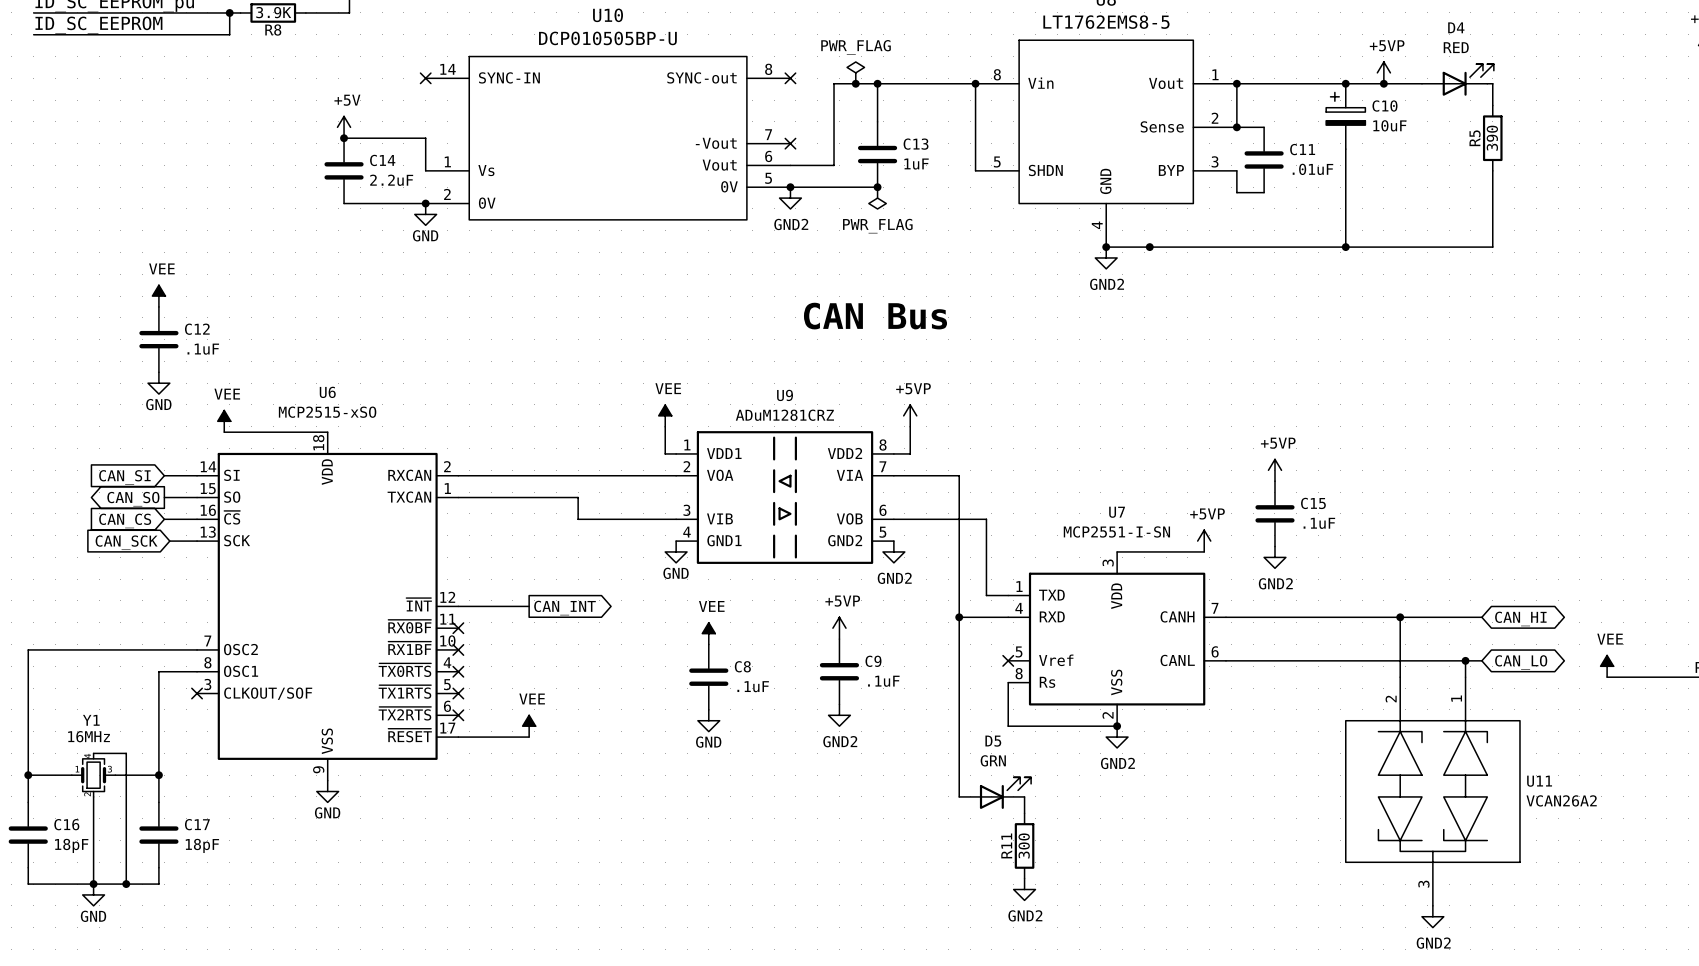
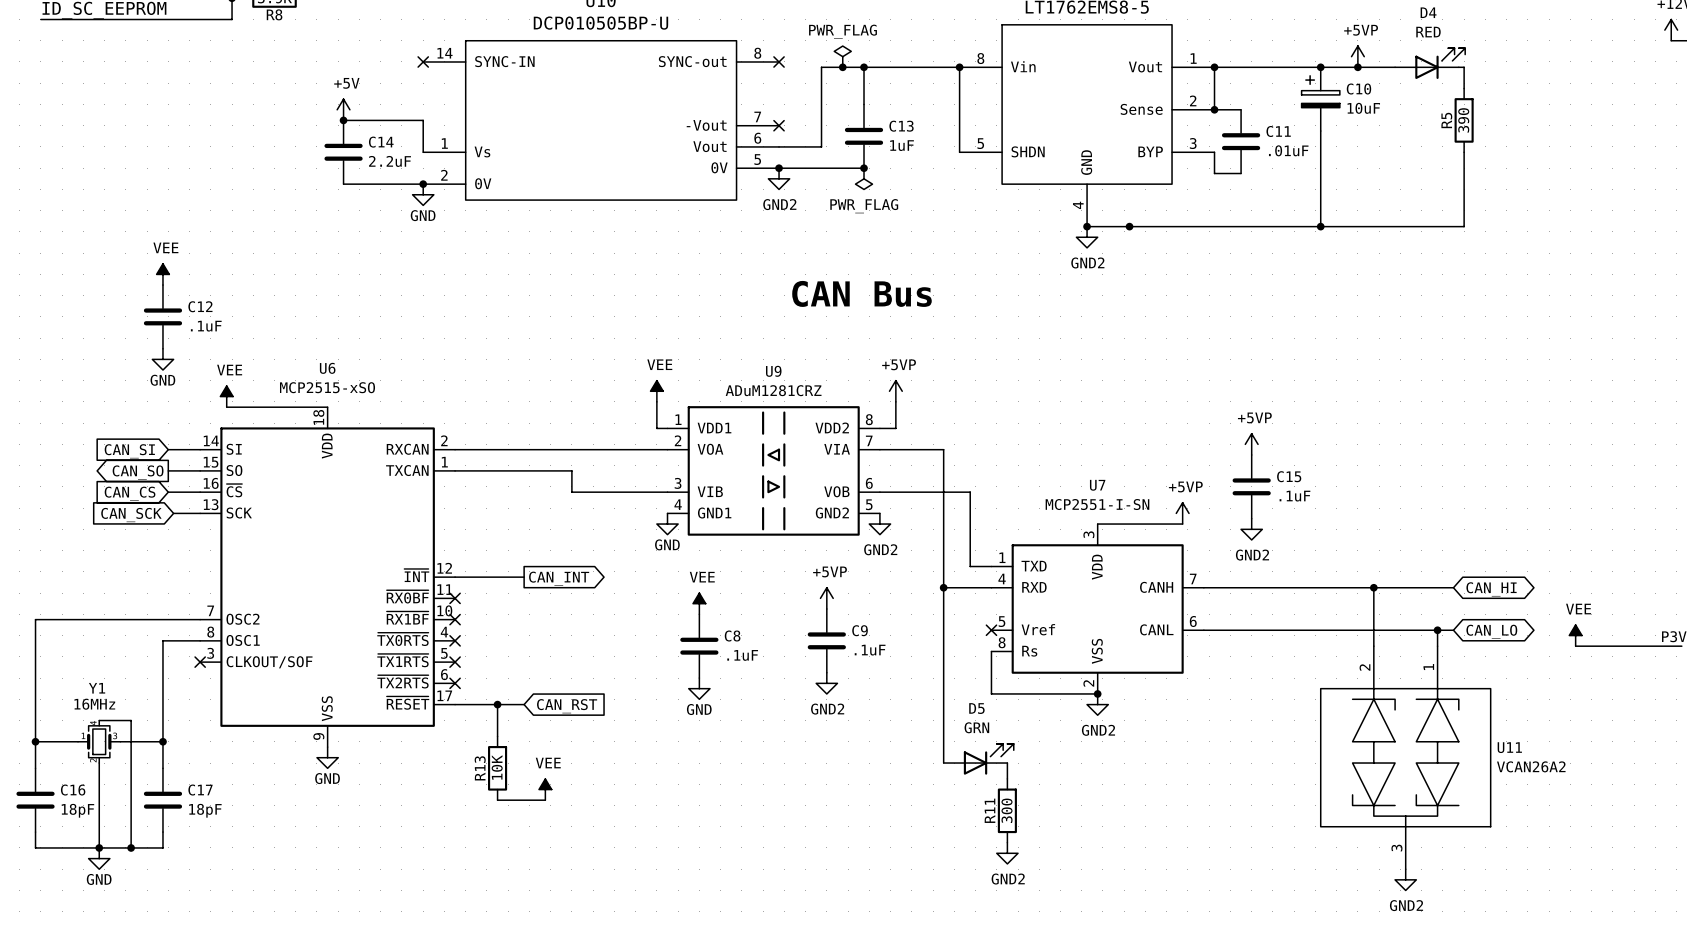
power symbol position: VEE (529, 726) -> VEE (545, 789)
wire: none -> (497, 704) (497, 736)
junction: none -> (497, 704)
global label: none -> CAN_RST (567, 706)
R13: none -> 10K (497, 768)
wire: none -> (497, 800) (545, 800)

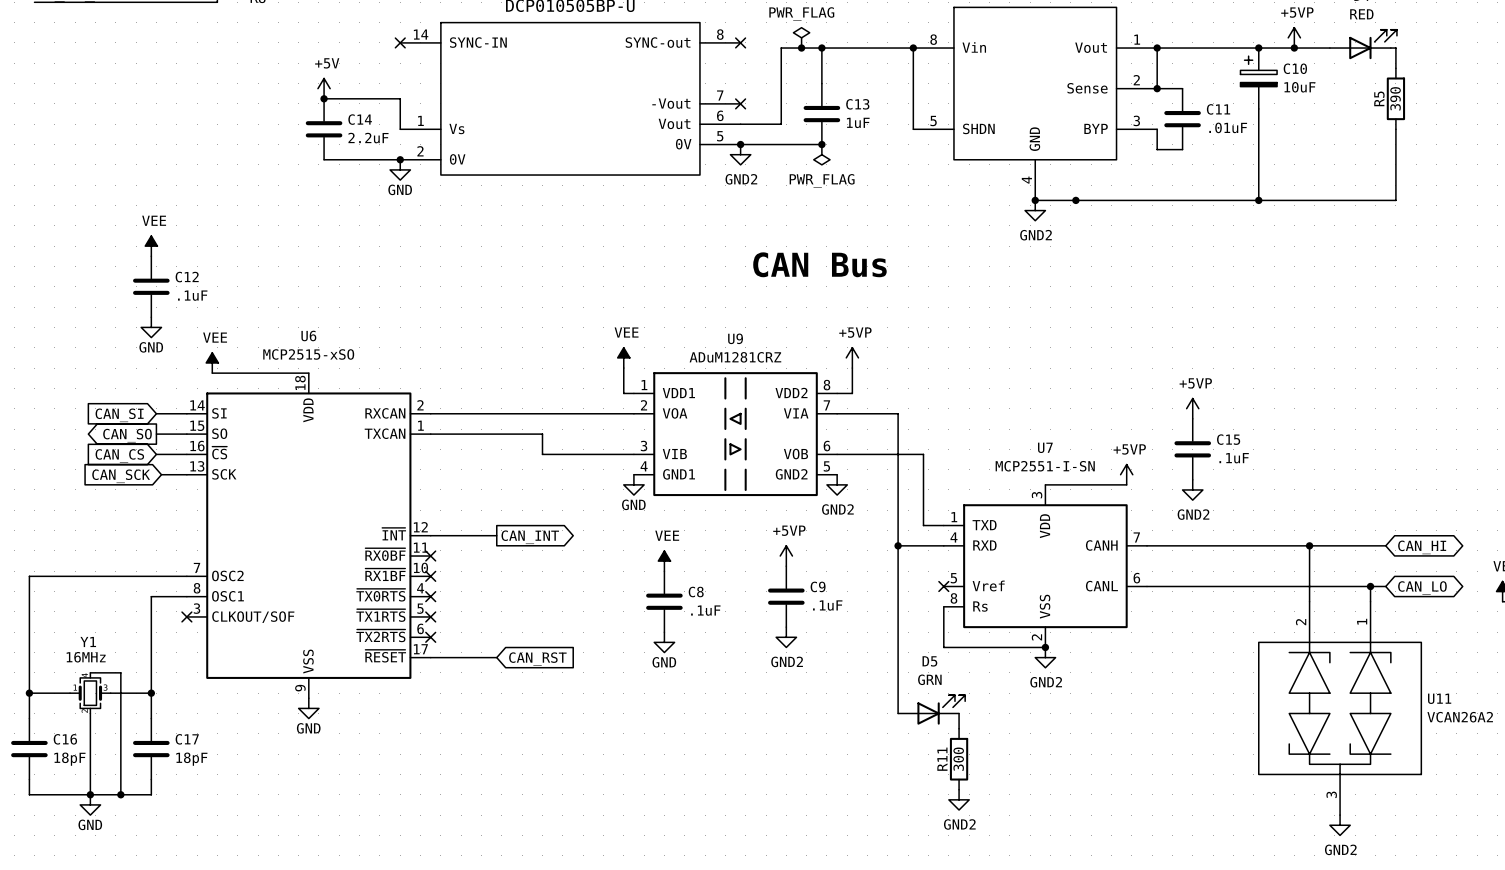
wire: (497, 704) (497, 736) -> none
junction: (497, 704) -> none
R13: 10K (497, 768) -> none
power symbol: VEE (545, 789) -> none
wire: (497, 800) (545, 800) -> none

